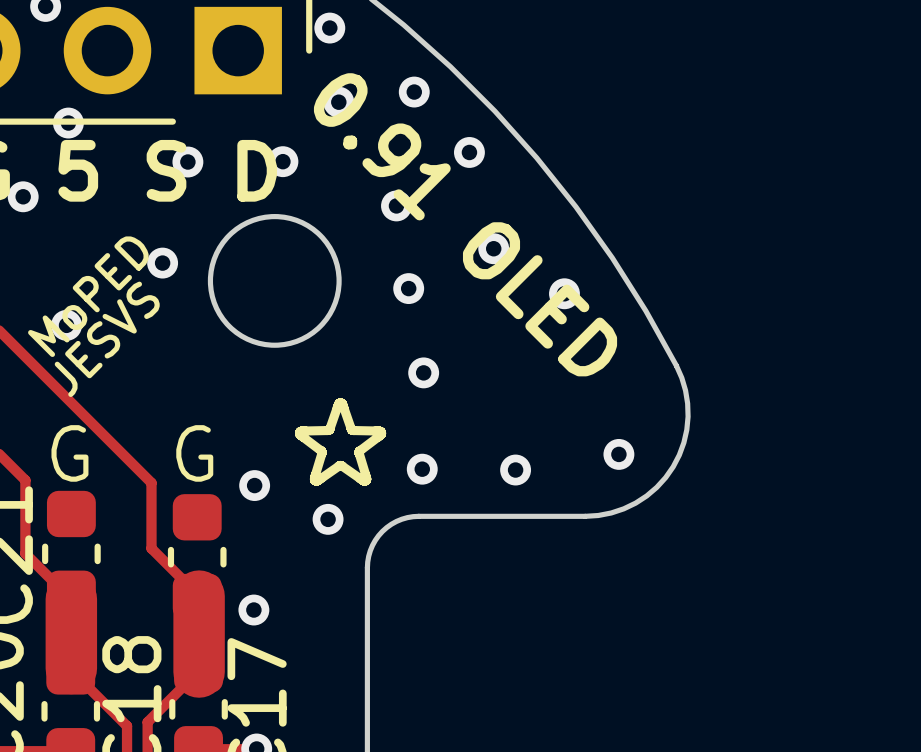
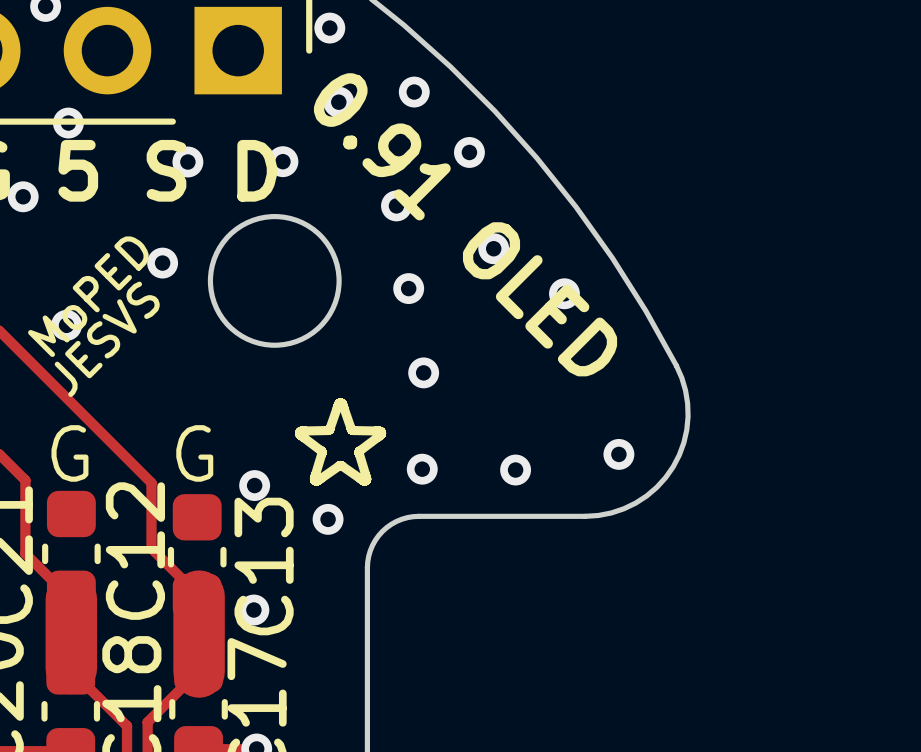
C12 name: none -> C12 (135, 551)
C13 name: none -> C13 (264, 566)

